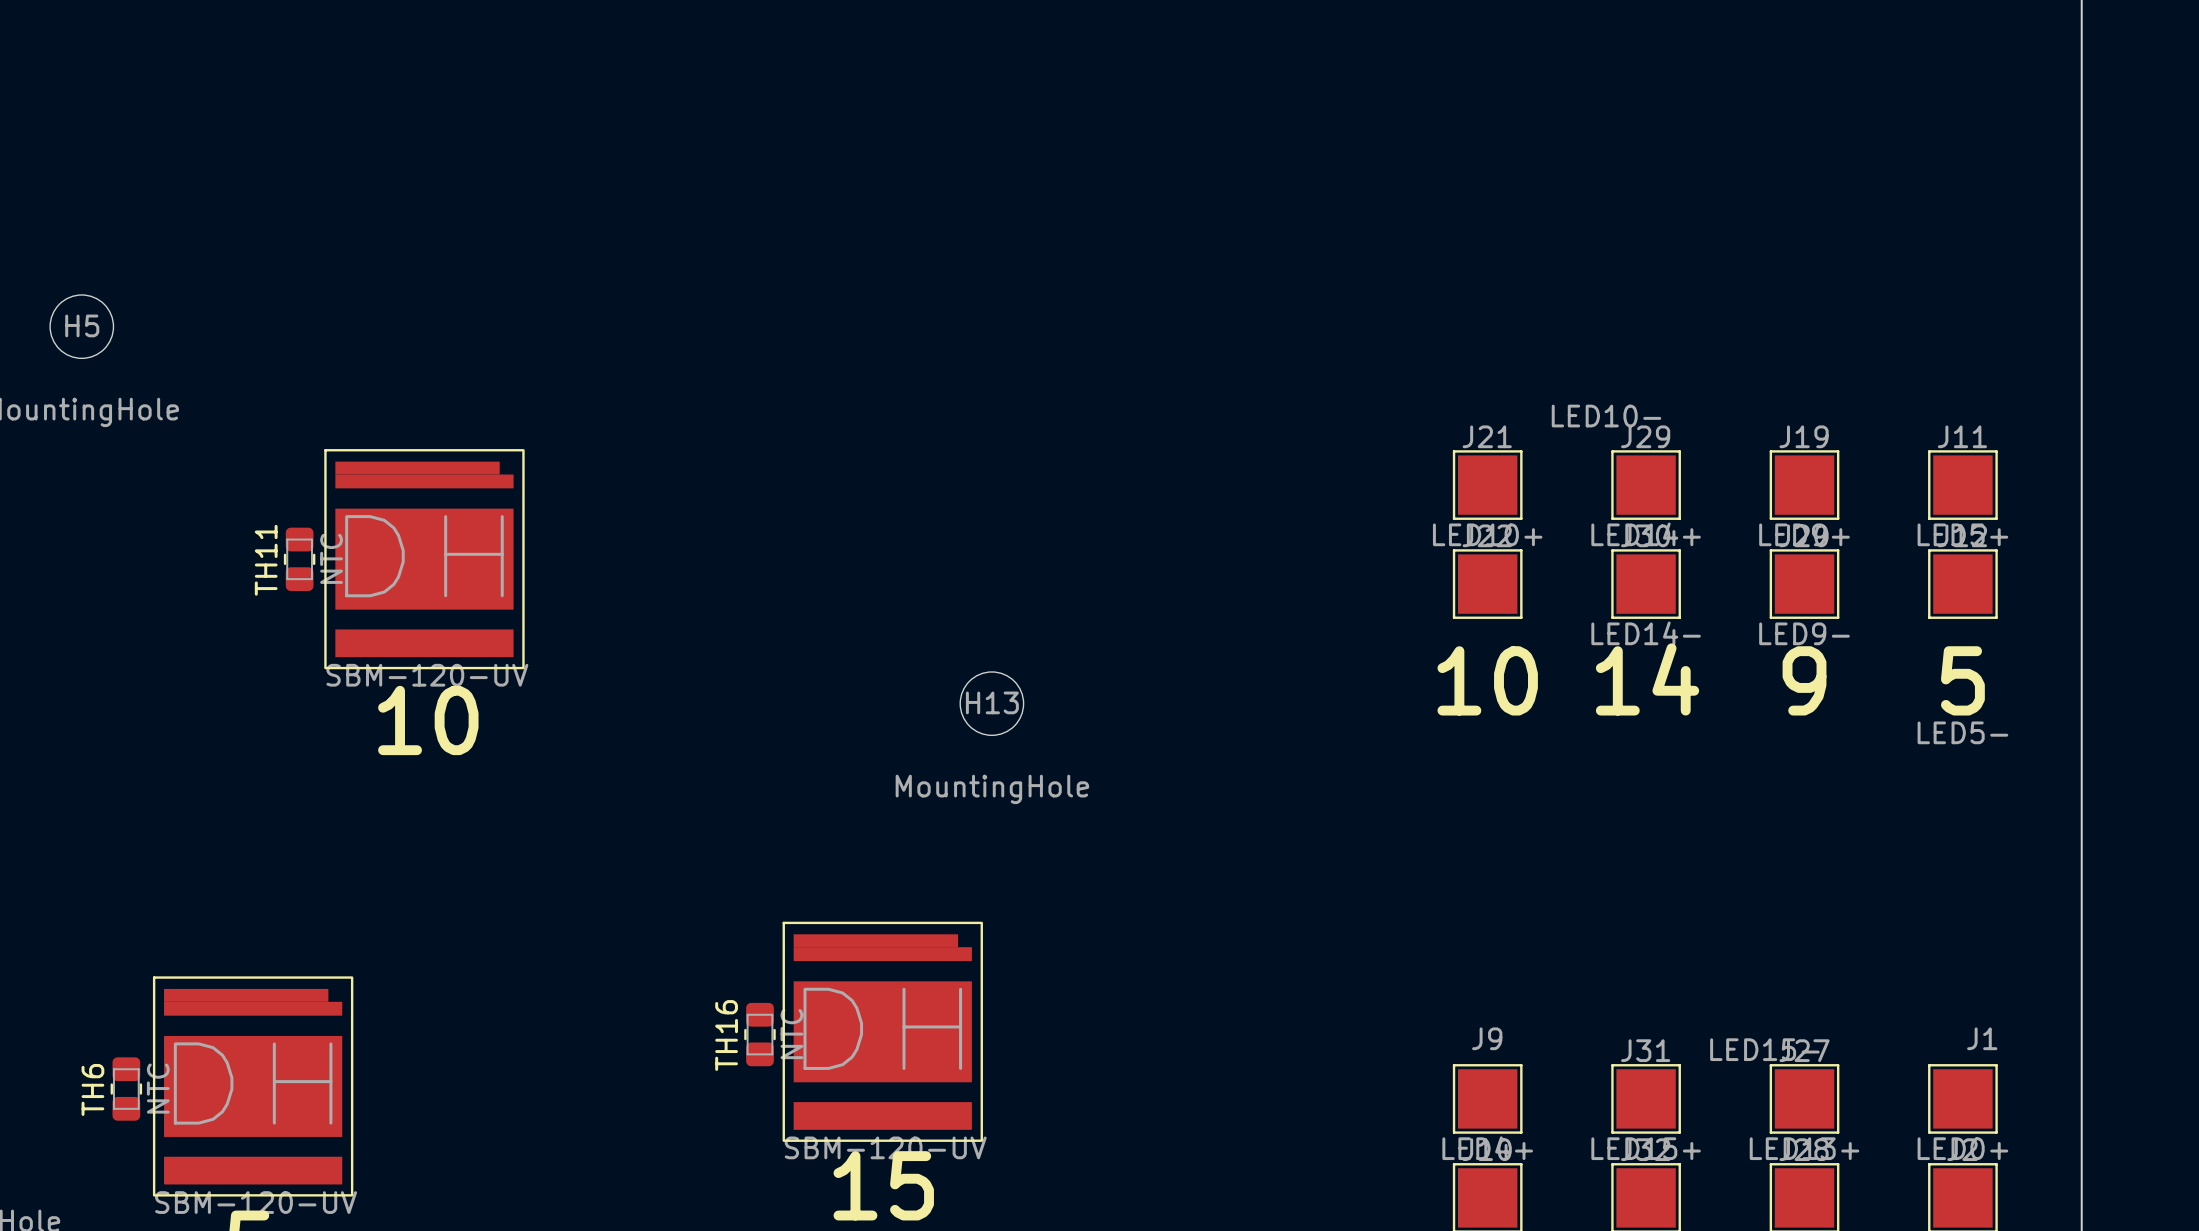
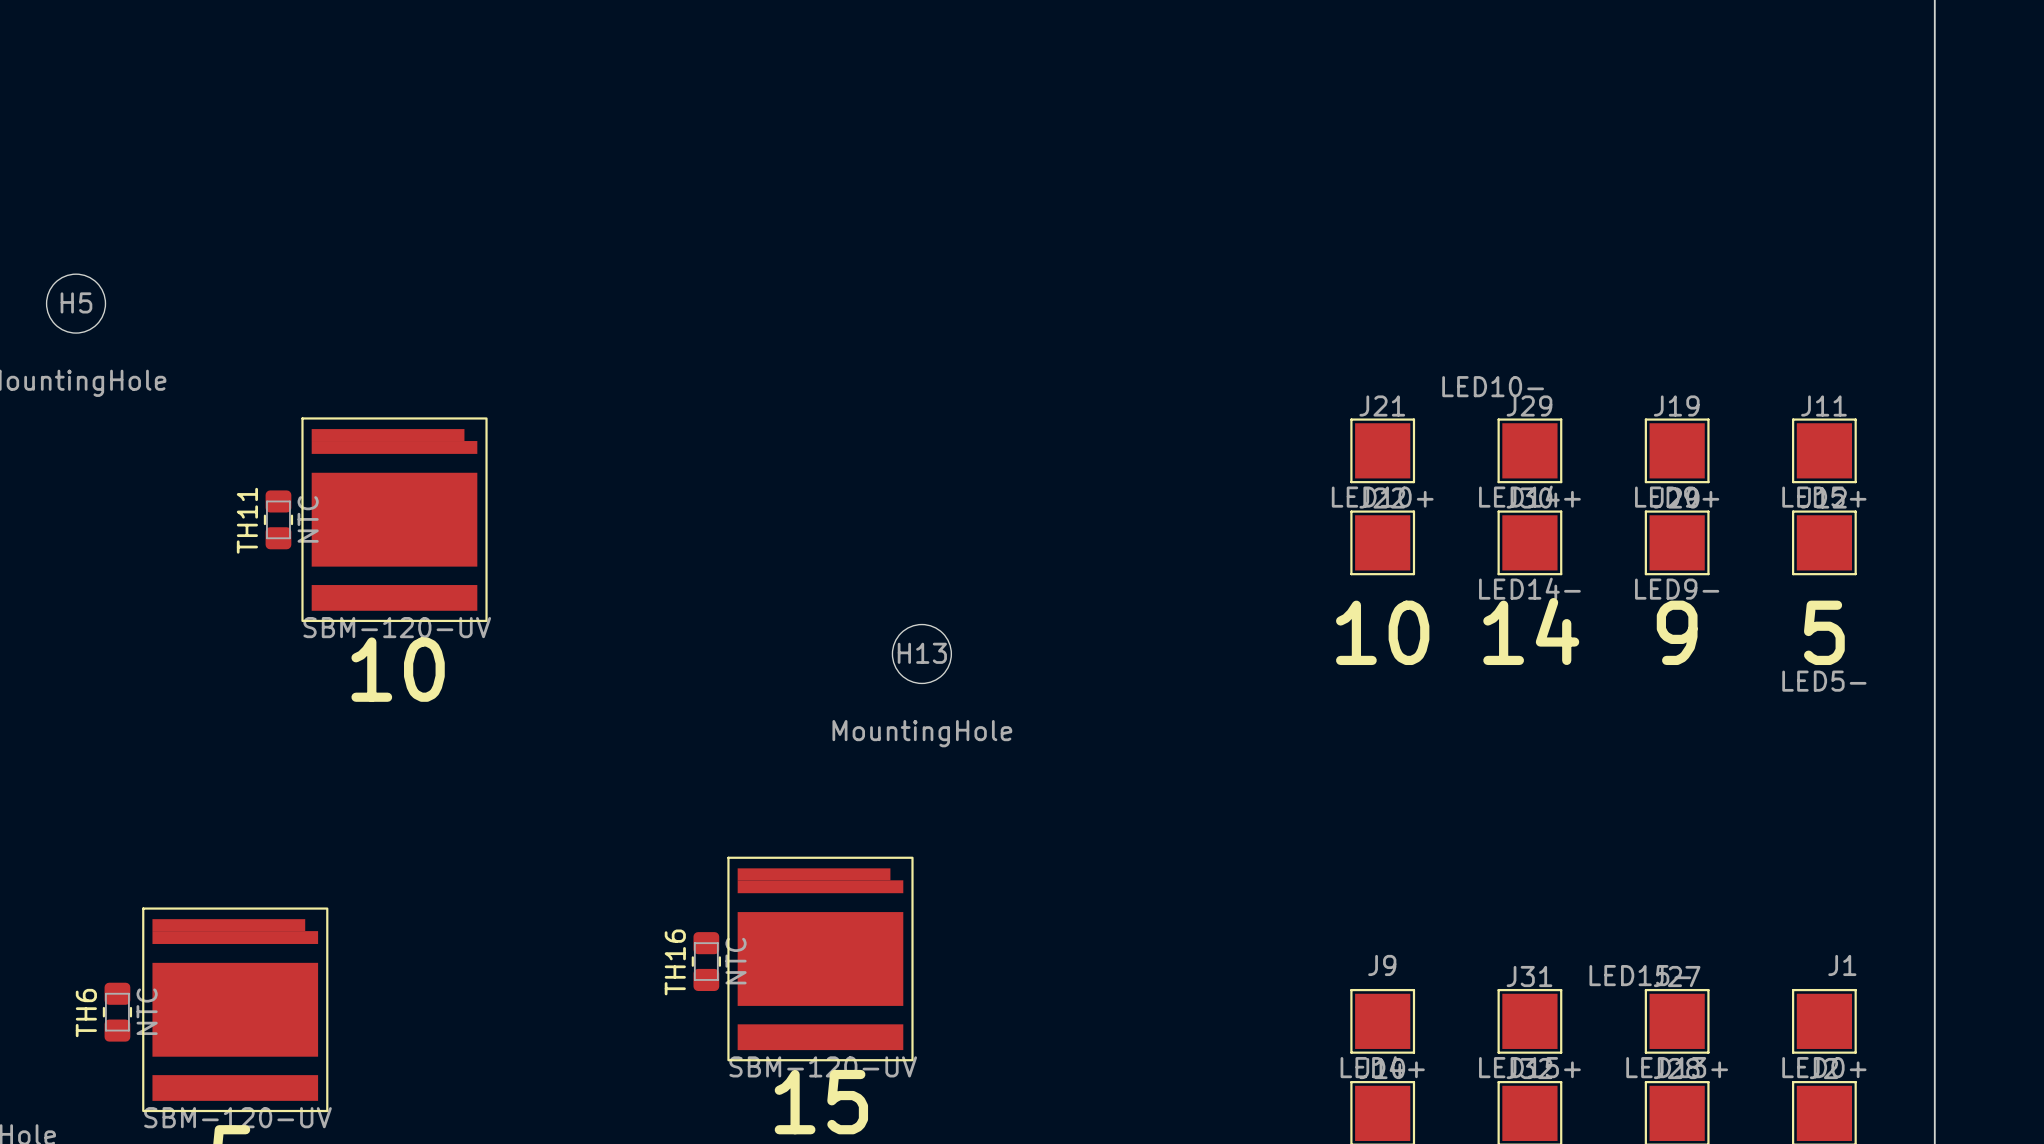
text: DH (424, 556) -> none
text: DH (882, 1028) -> none
text: DH (253, 1083) -> none

